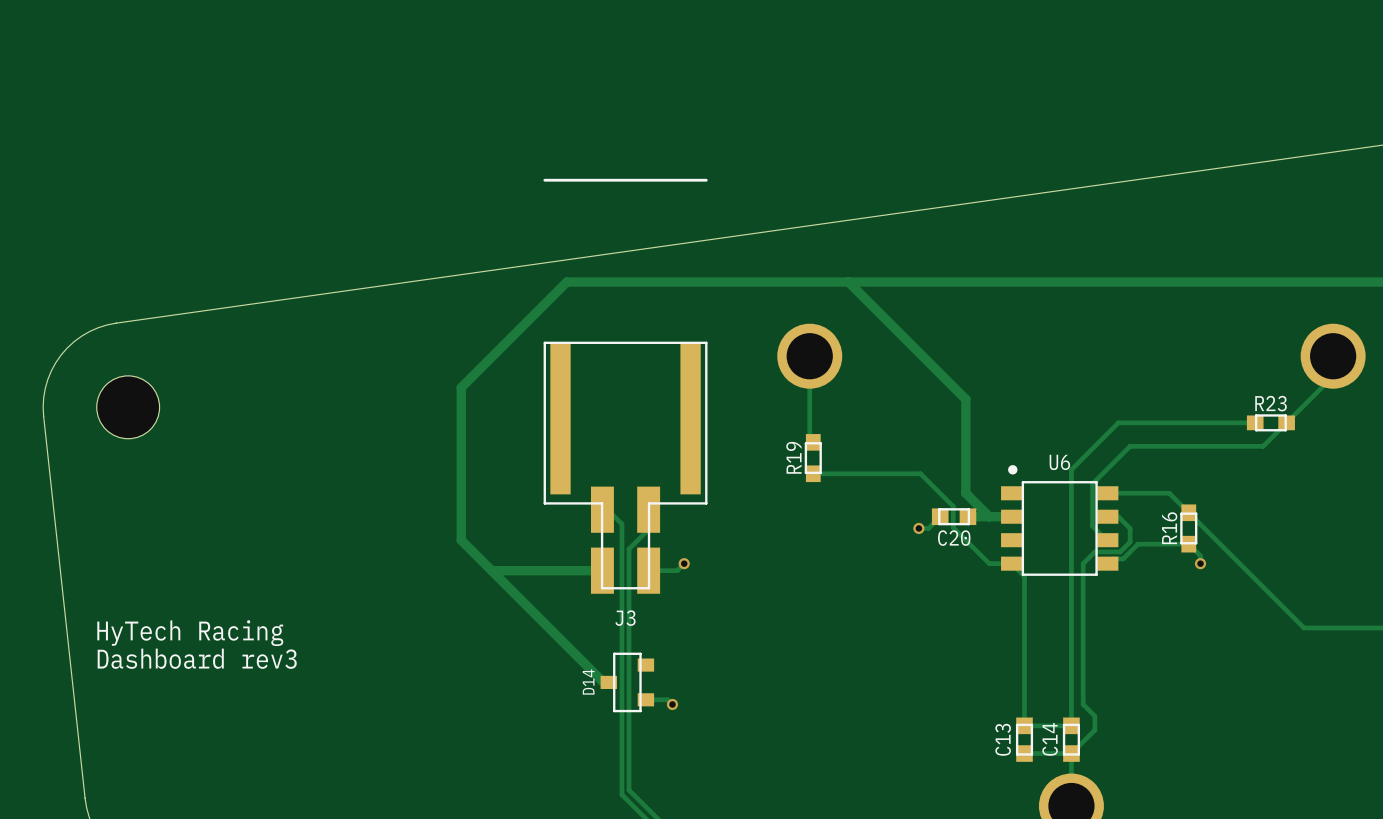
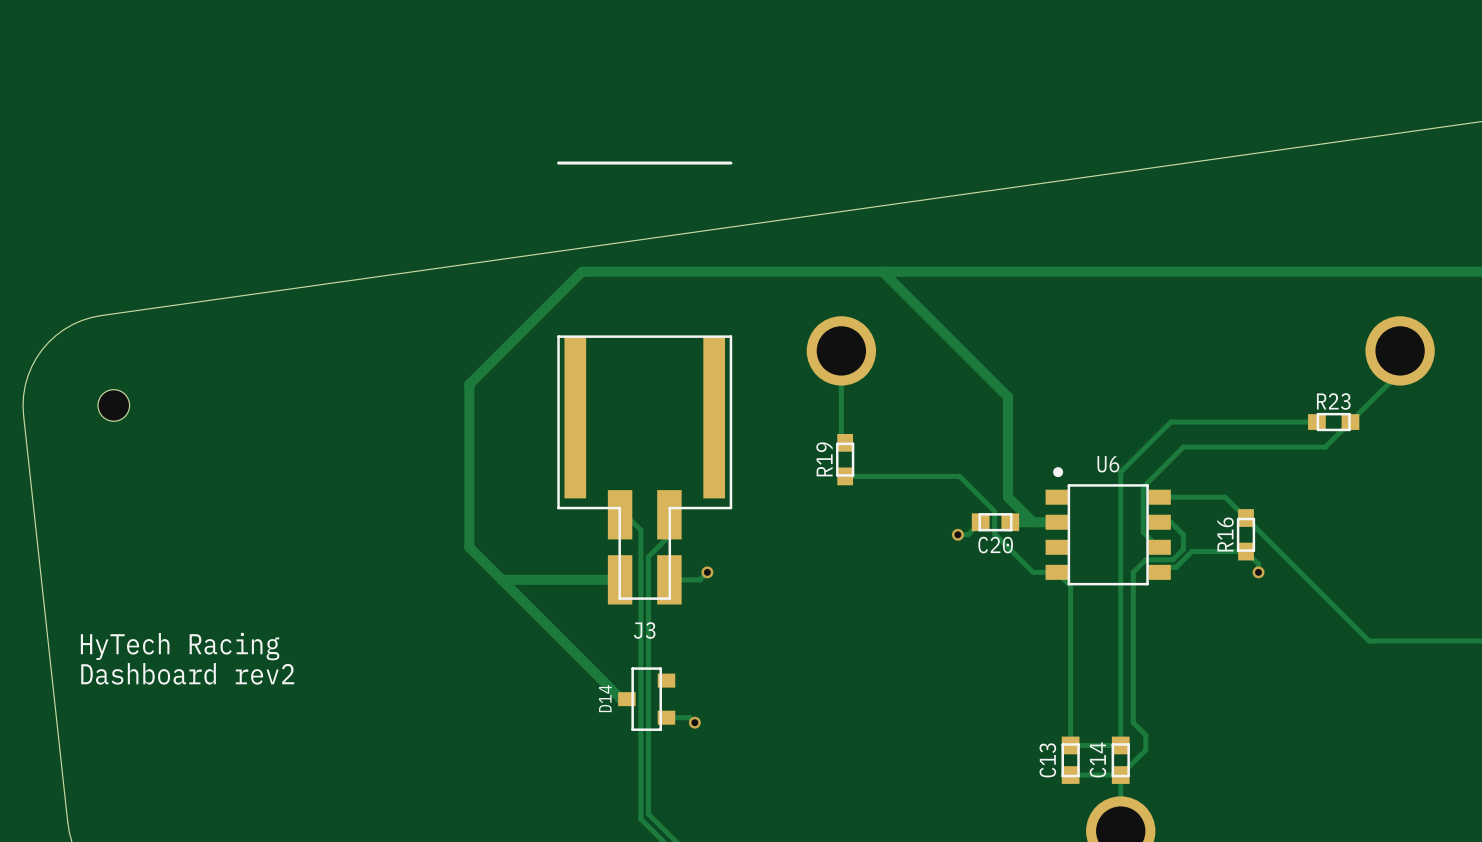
part: (128, 407) -> none
hole: none -> (113, 405)
text: Dashboard rev3 (197, 658) -> Dashboard rev2 (187, 673)

